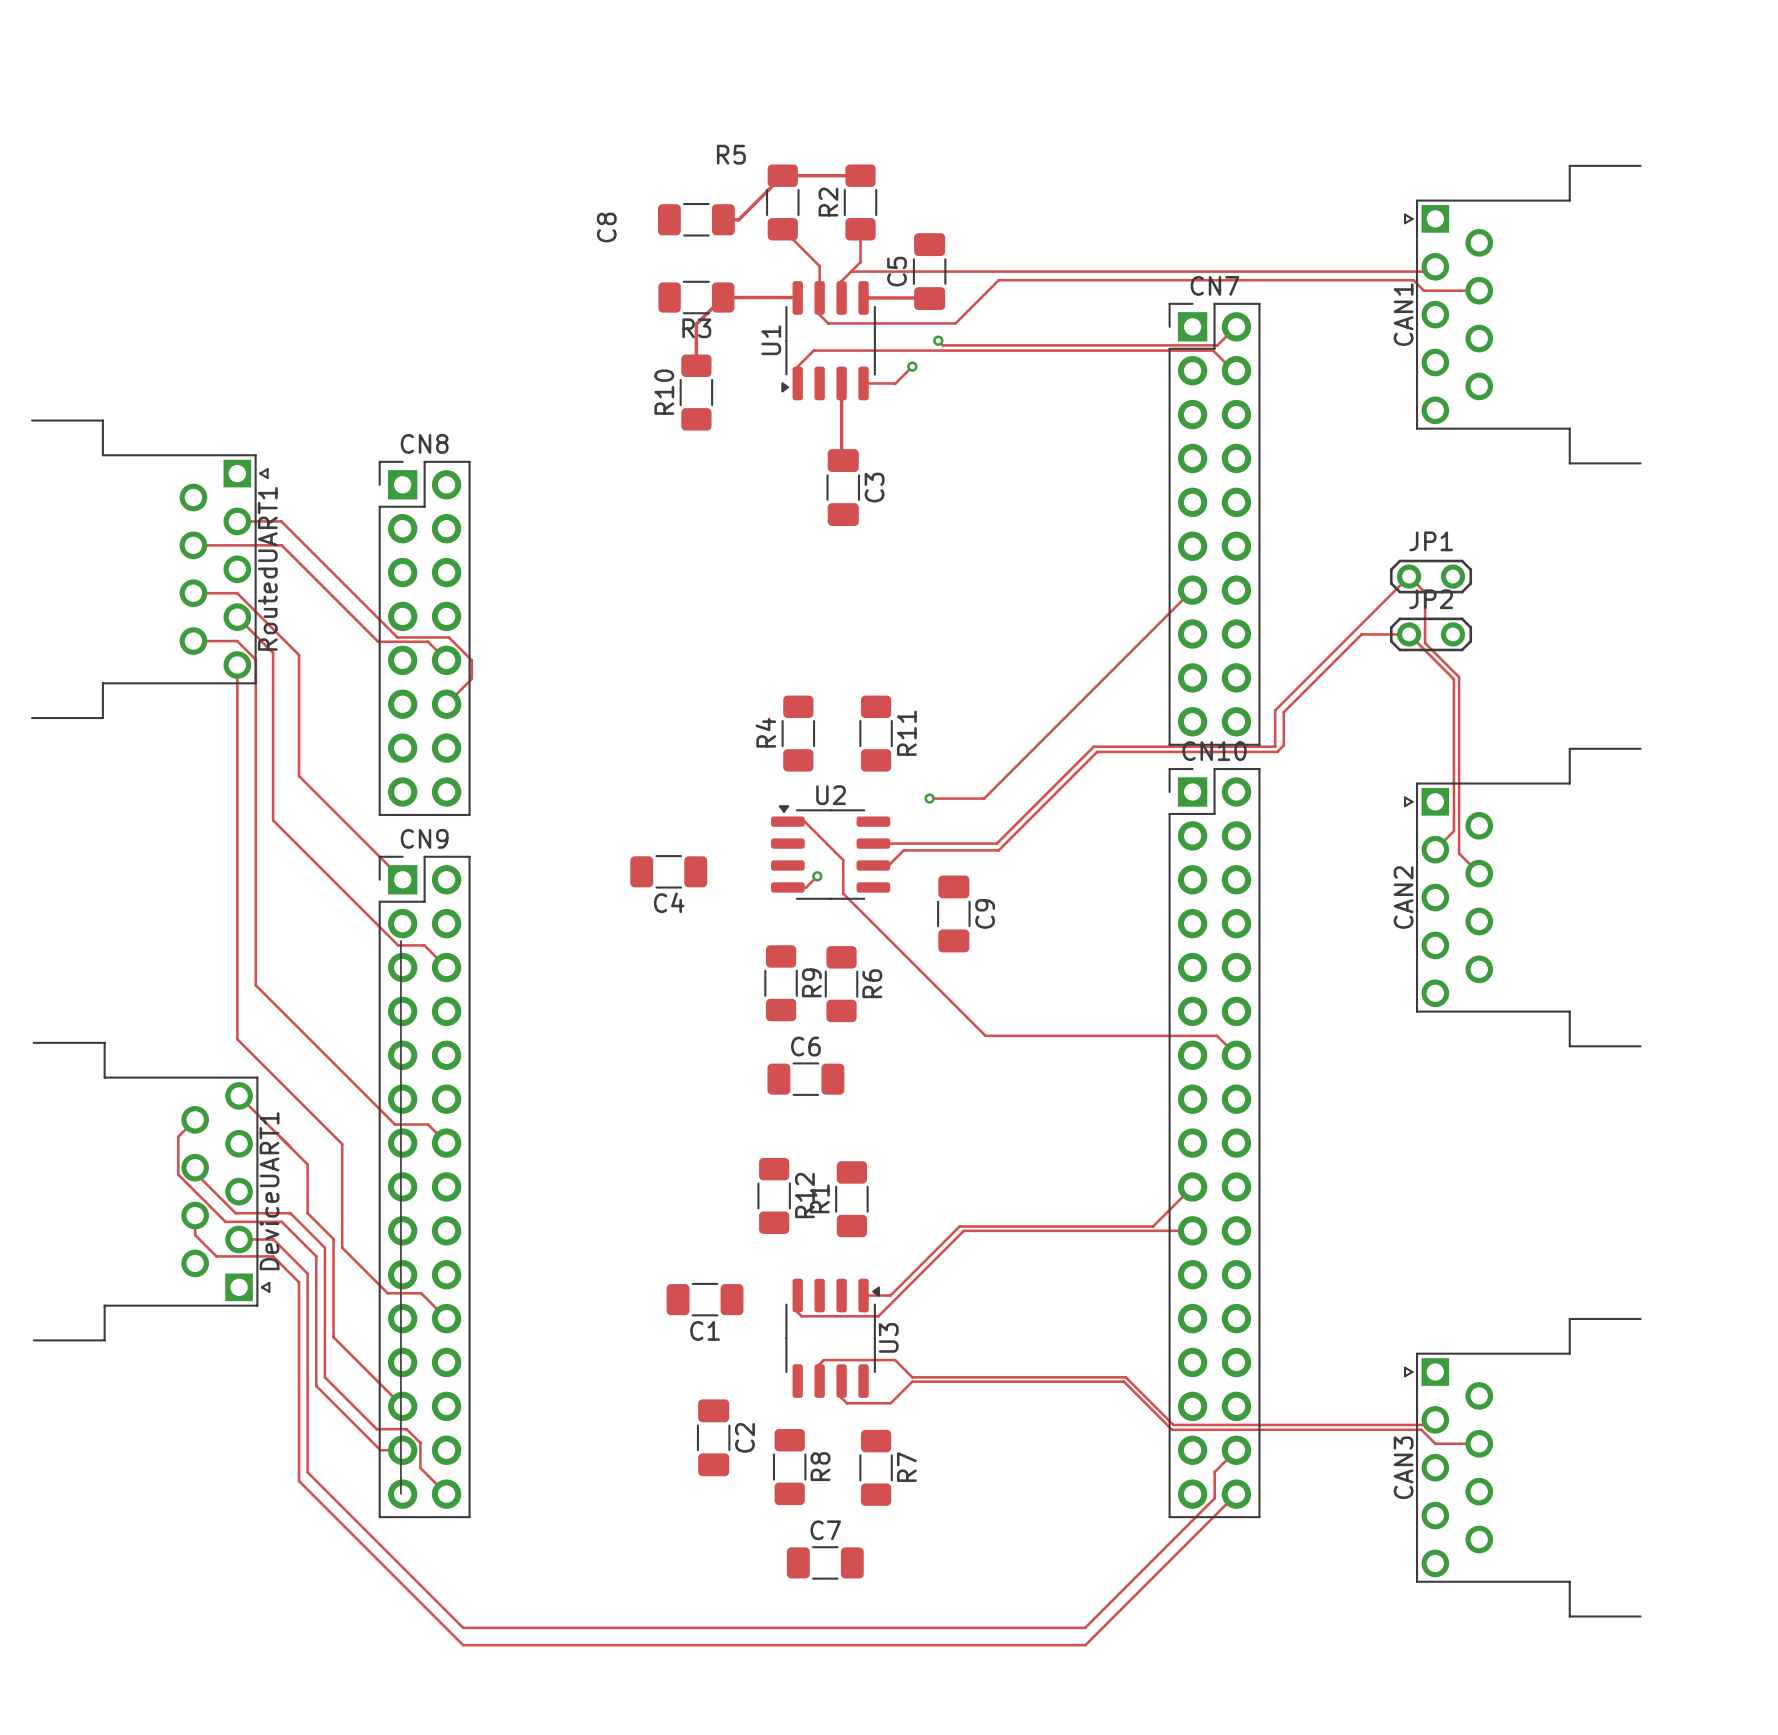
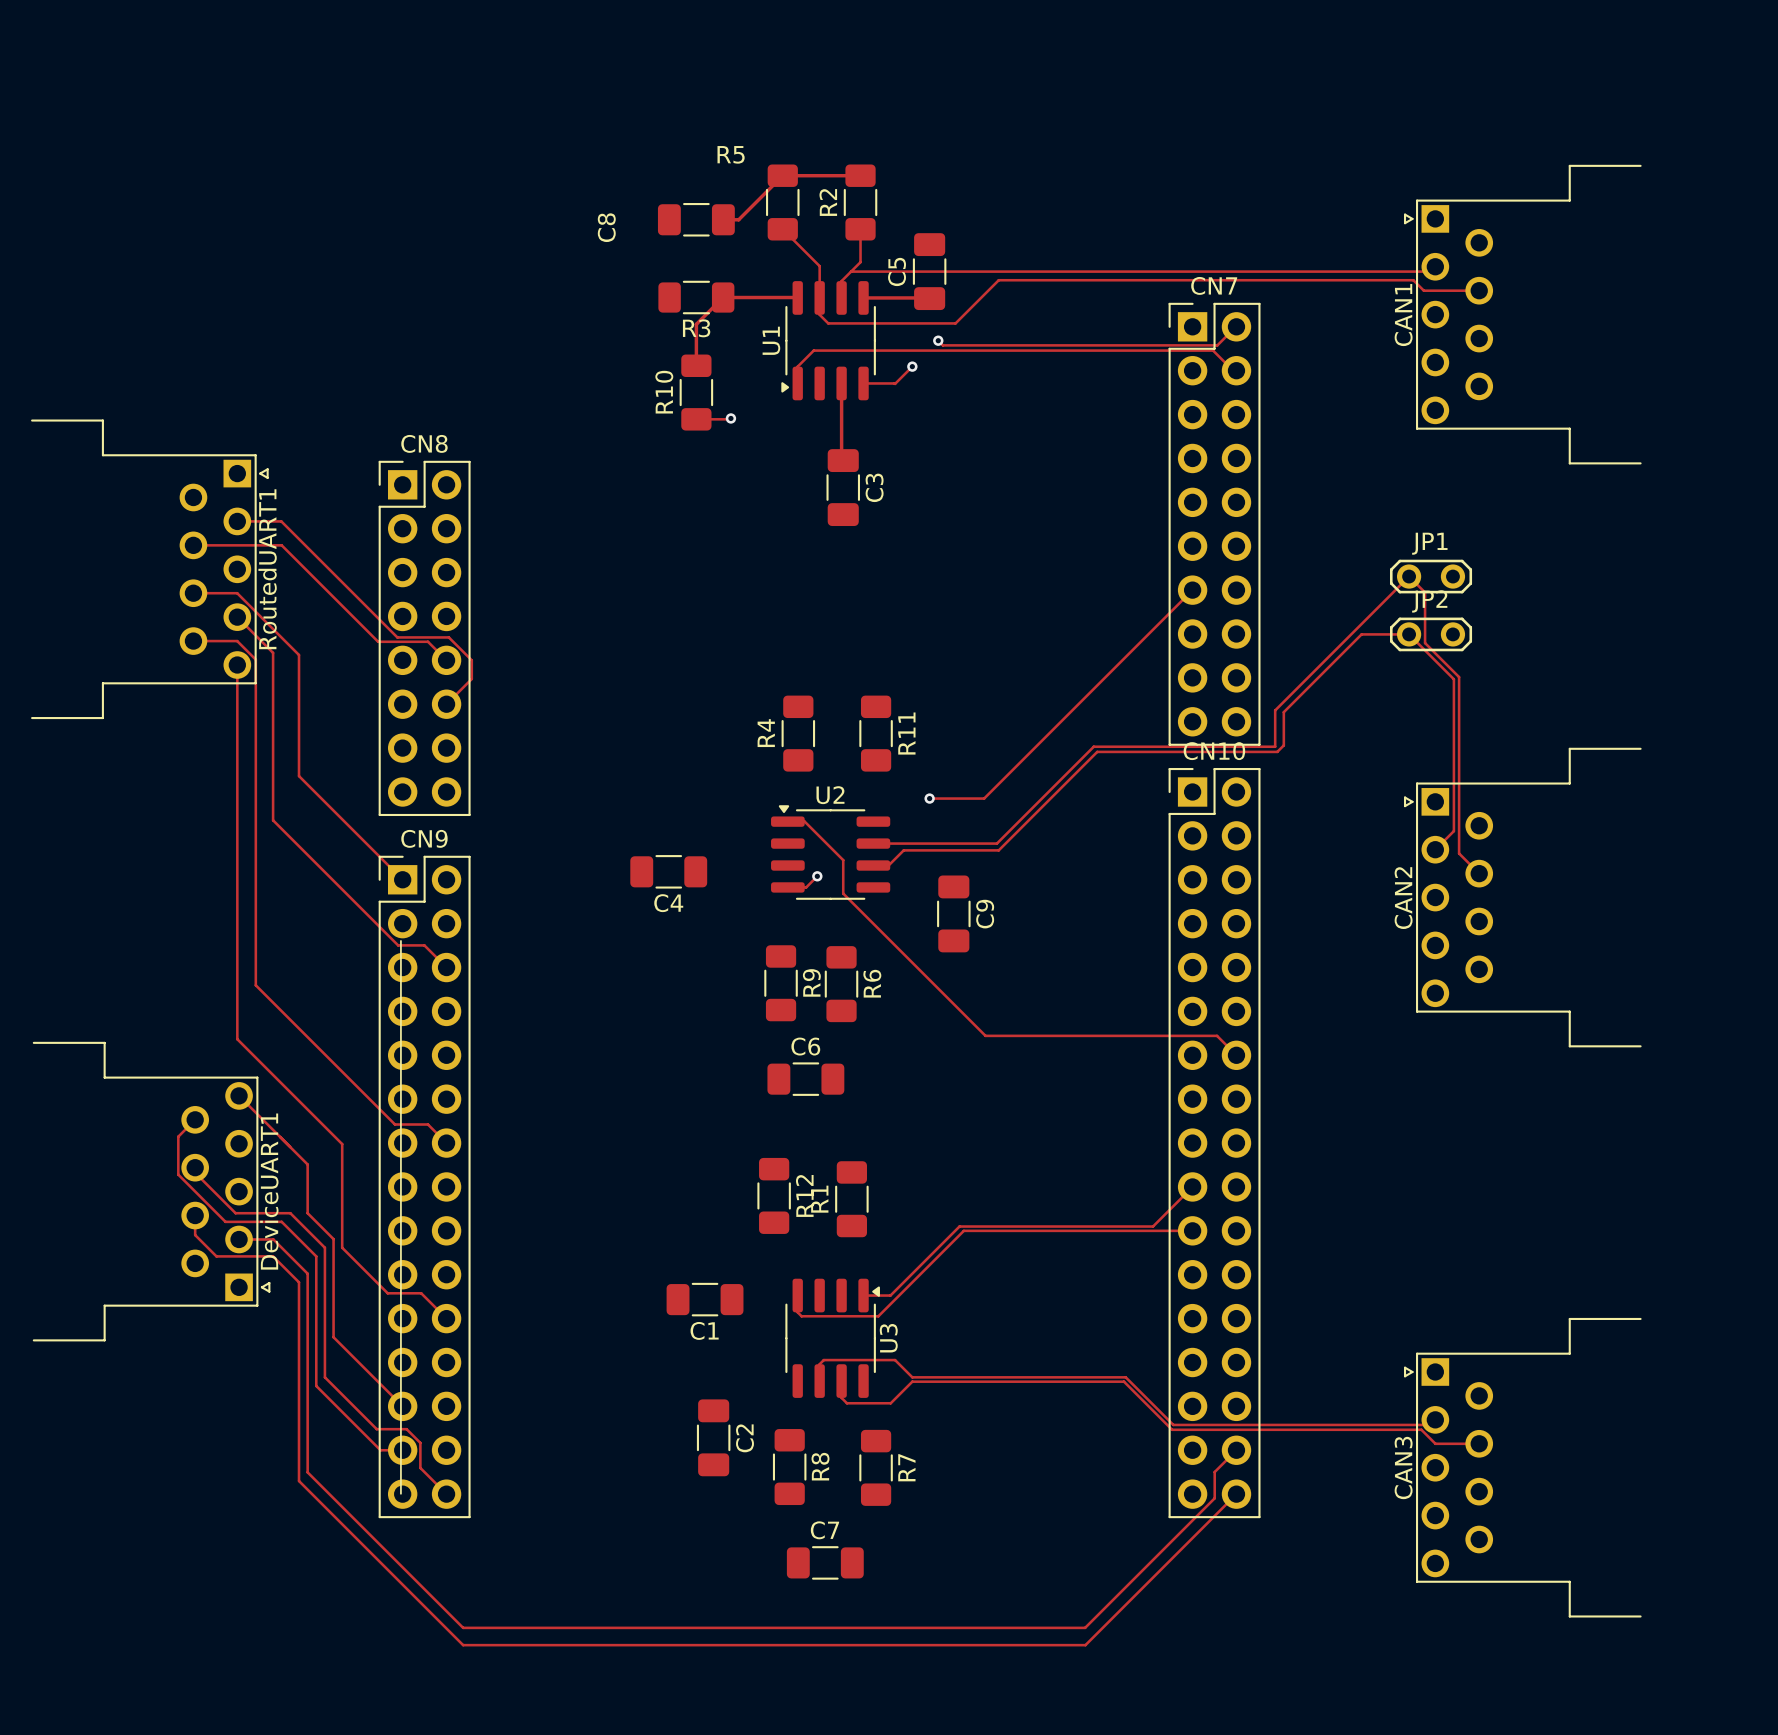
track: none -> (730, 418) (696, 419)
via: none -> (730, 418)

